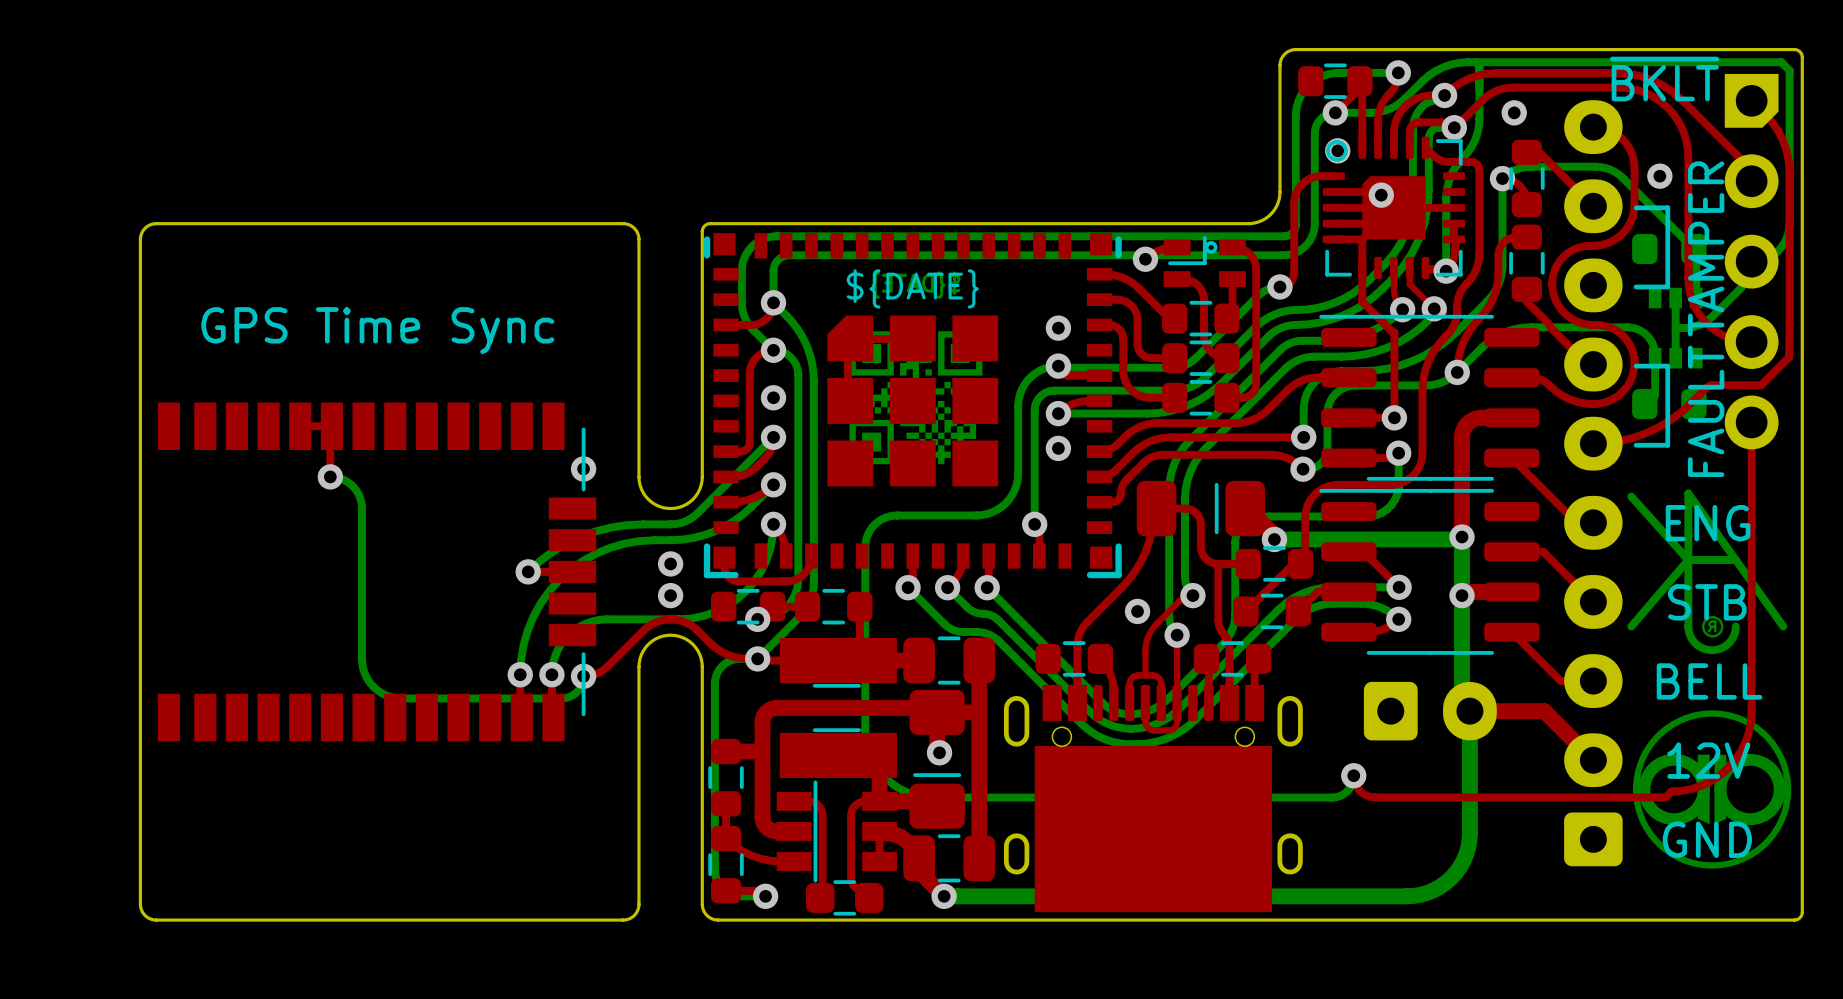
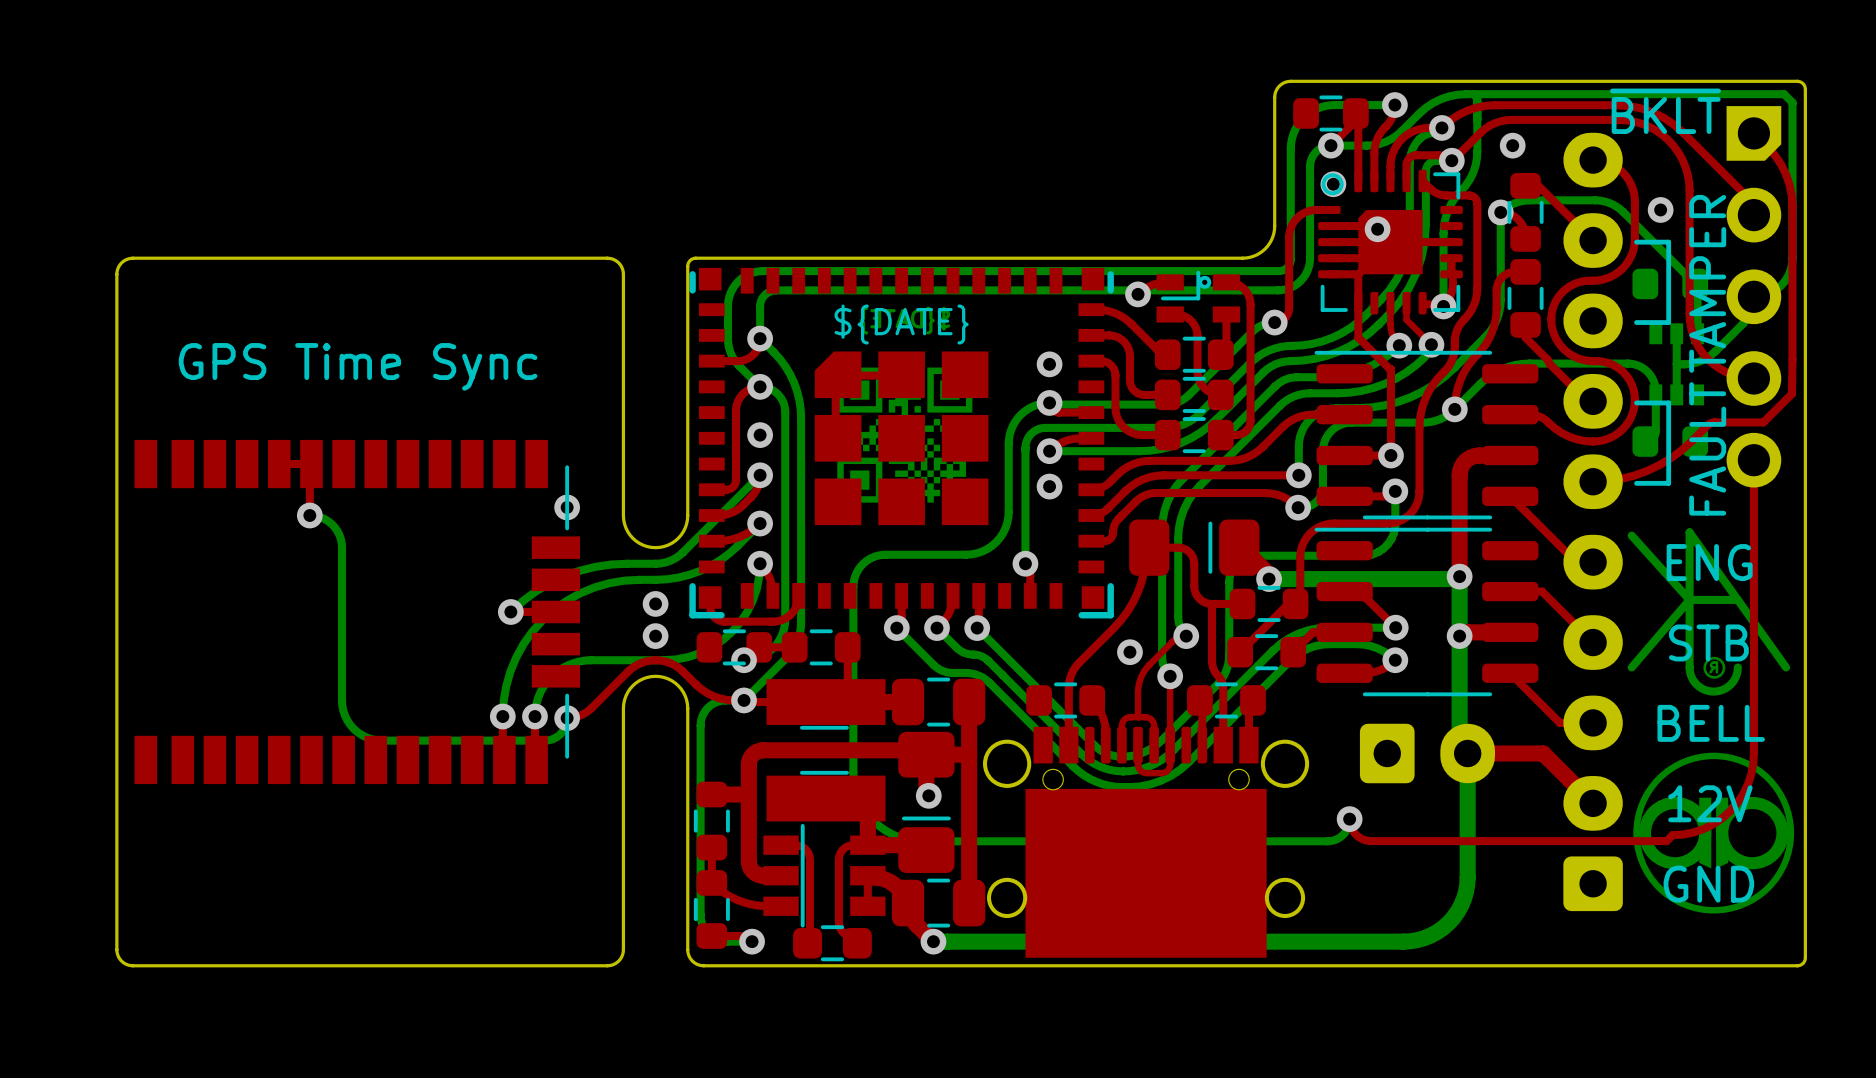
part footprint: [1003, 684, 1303, 913] -> [982, 726, 1310, 958]

